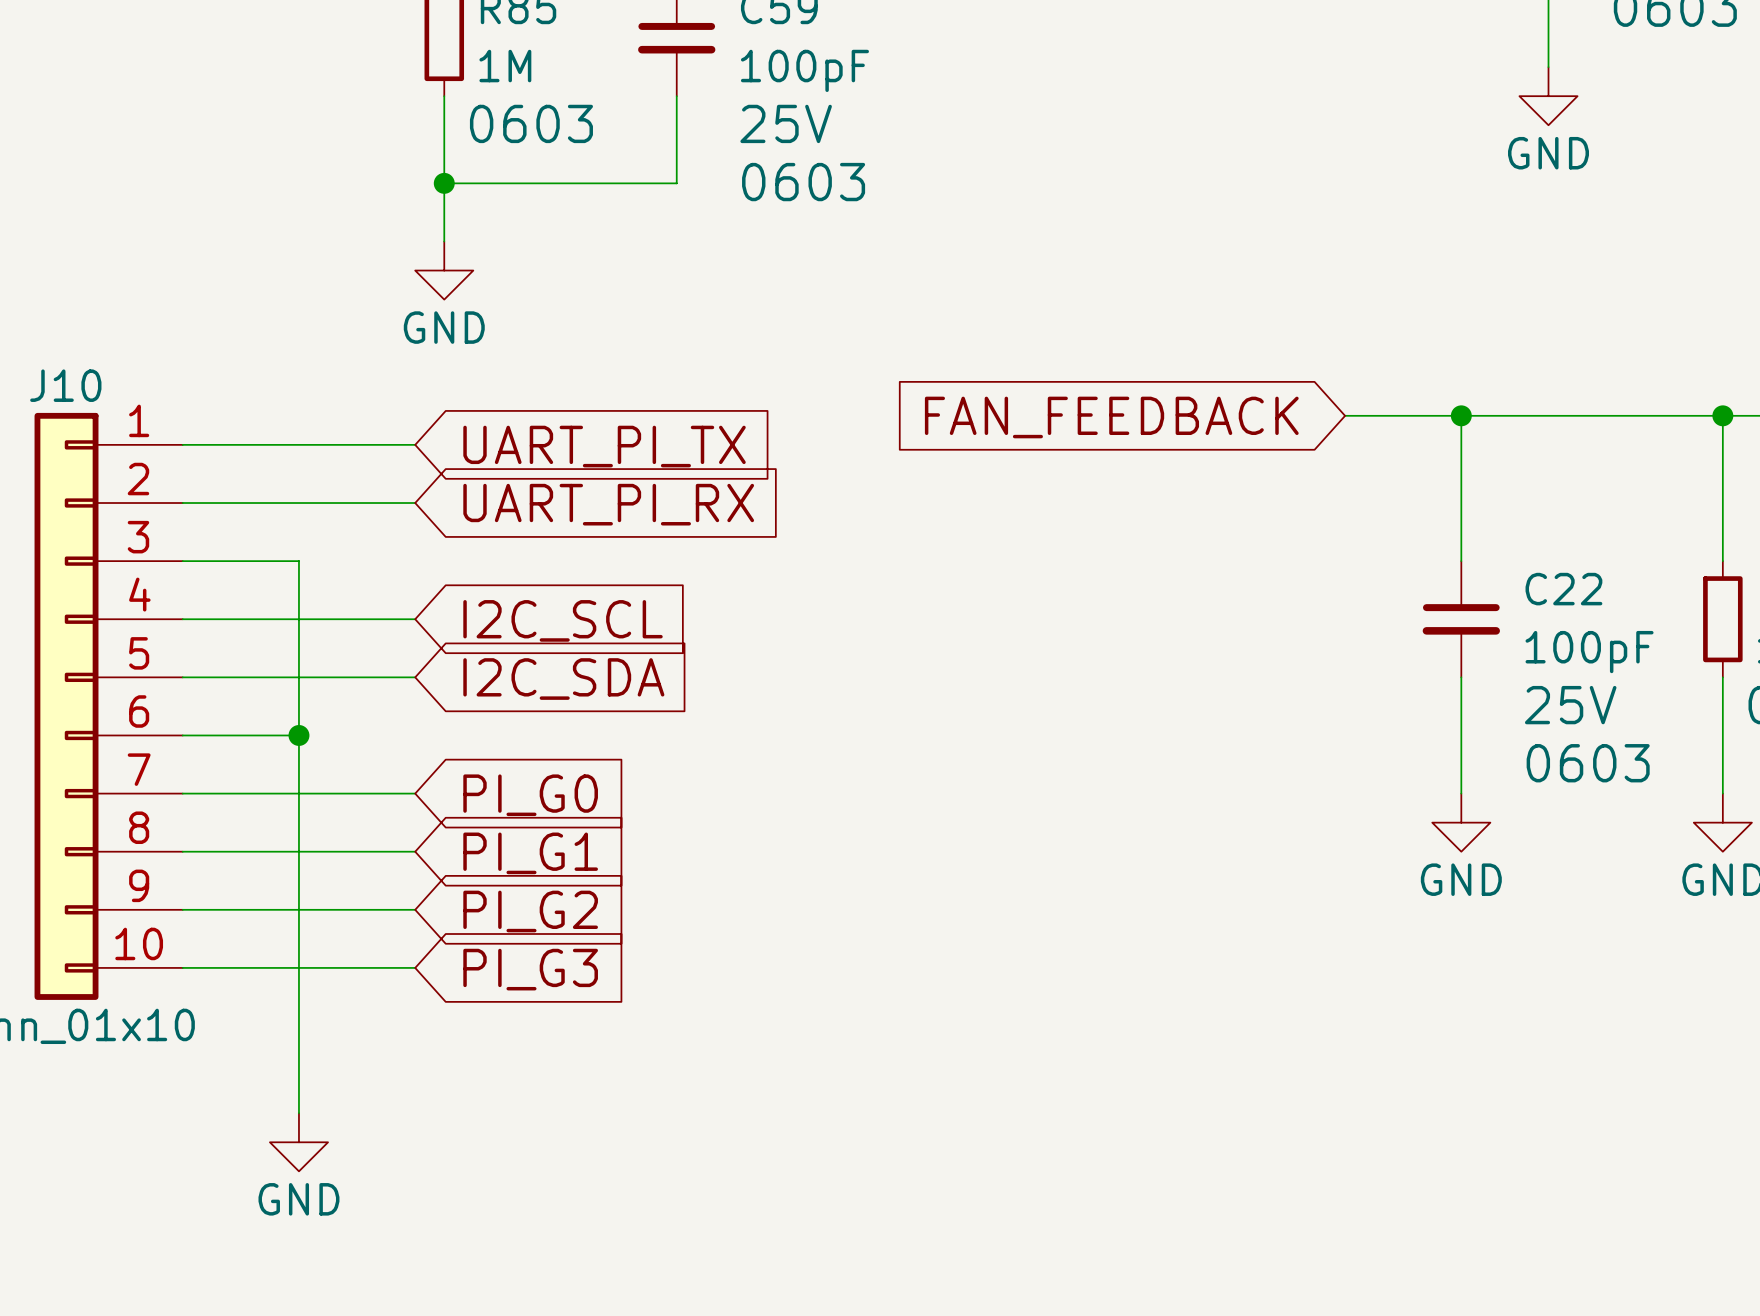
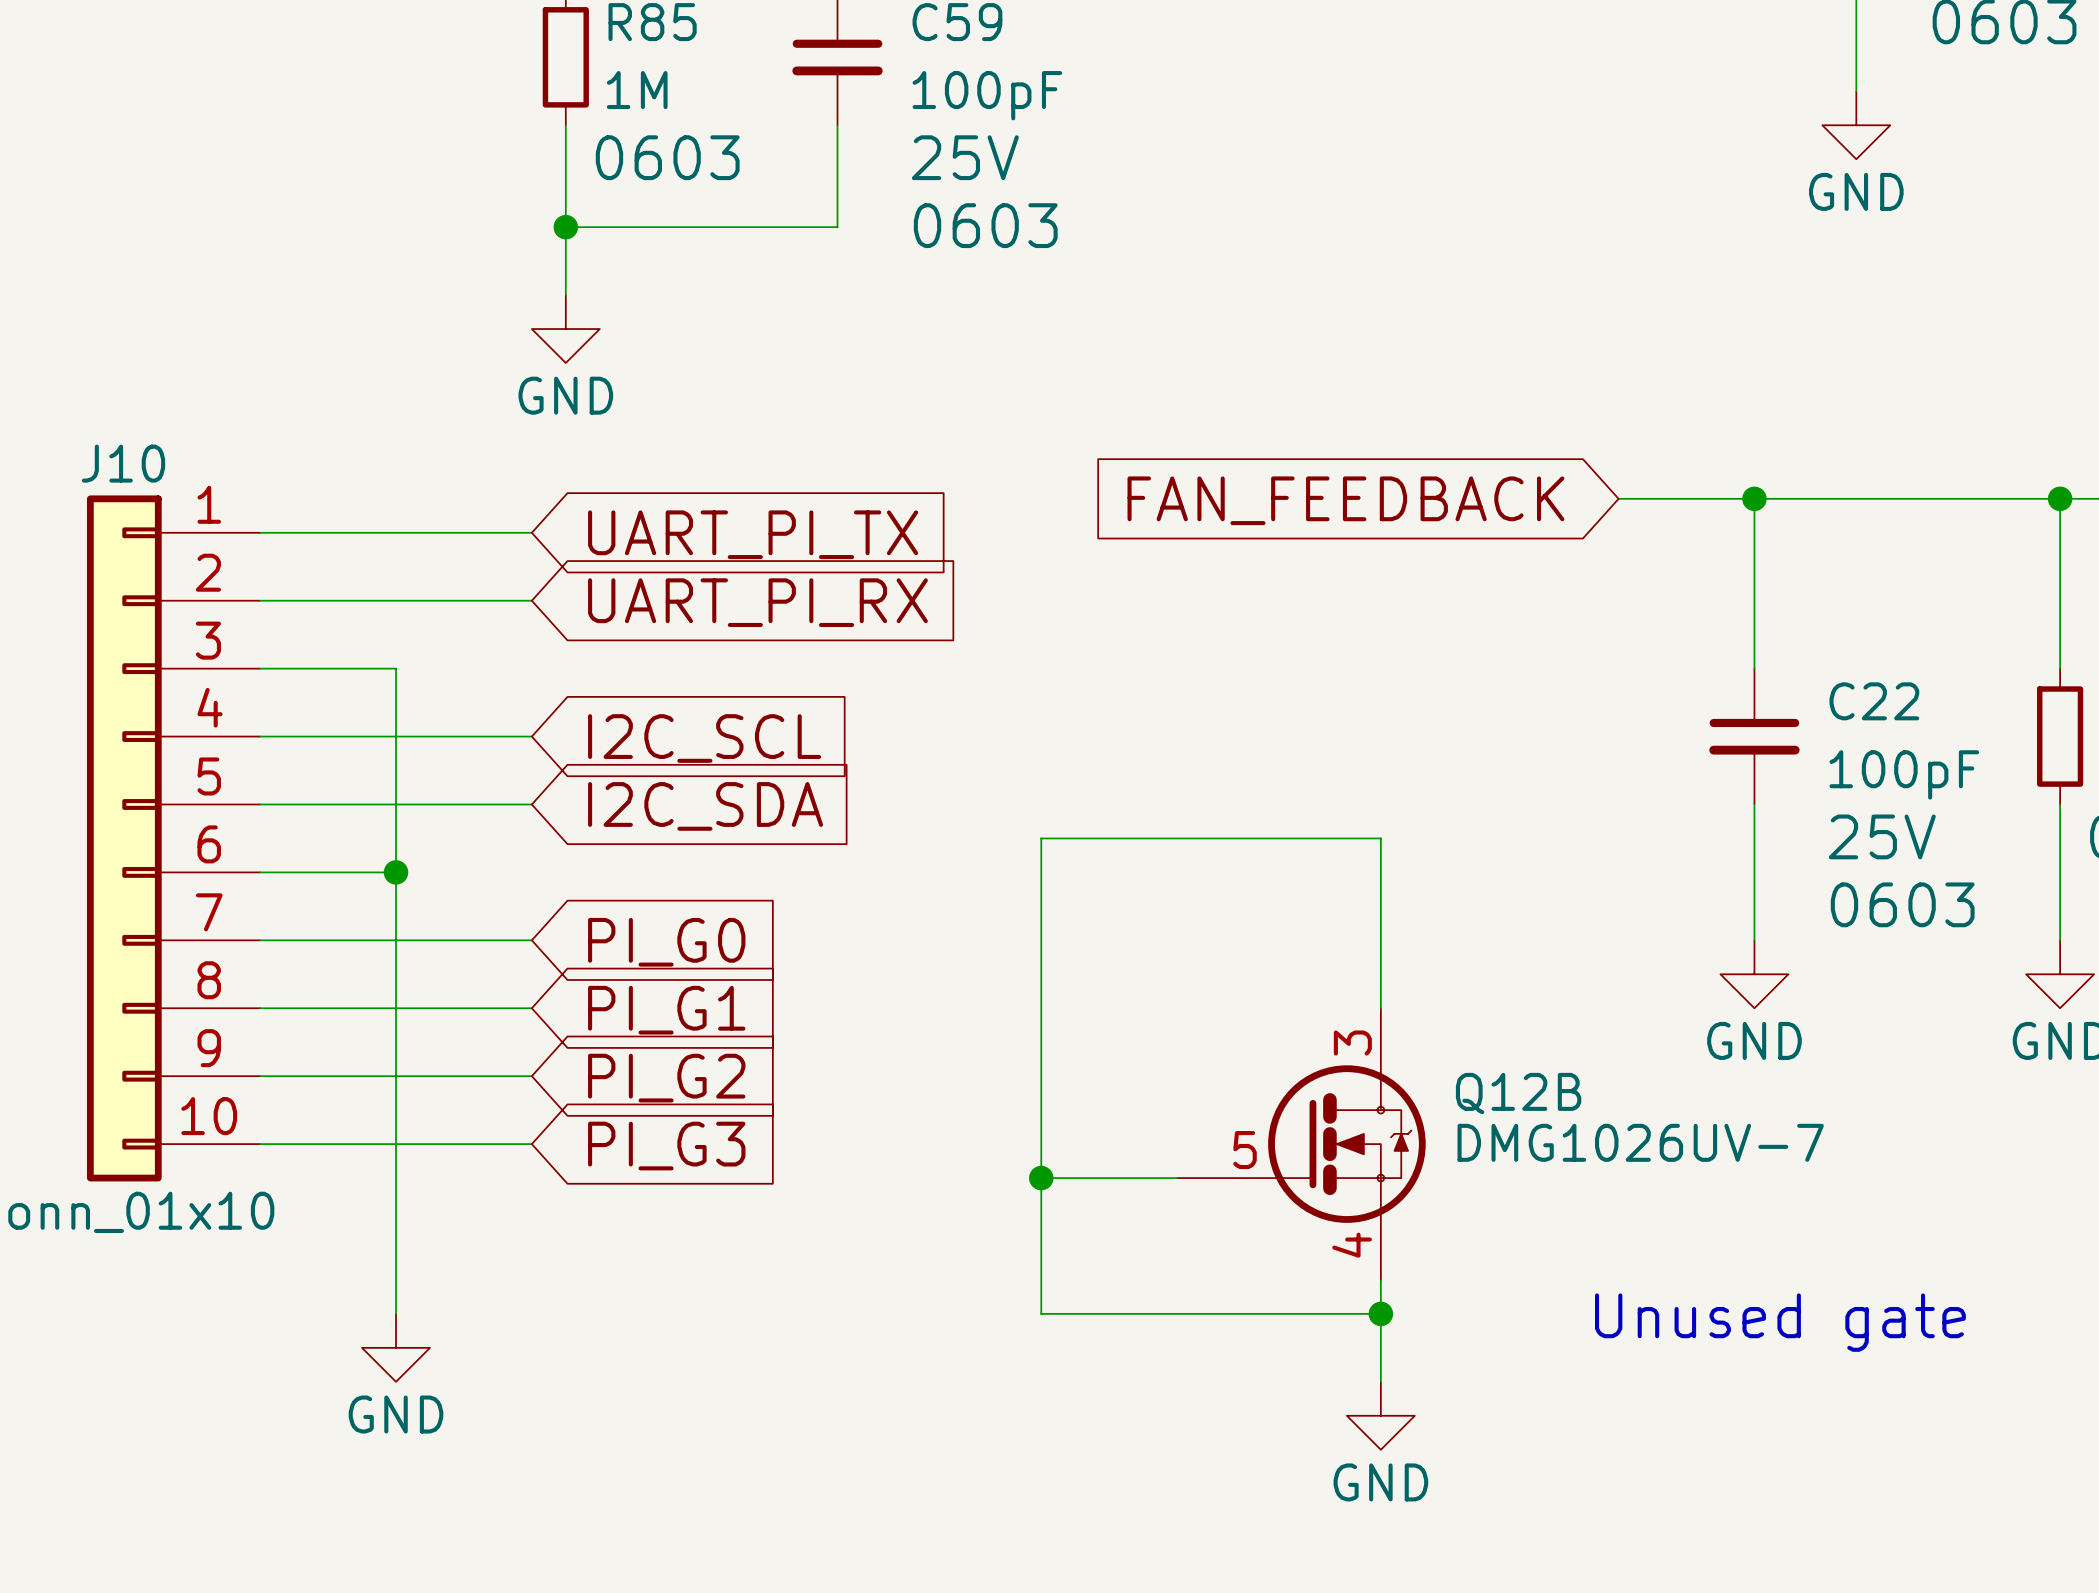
wire: none -> (1380, 1008) (1380, 838) (1041, 838) (1041, 1313) (1380, 1313)
Q12B: none -> DMG1026UV-7 (1301, 1144)
wire: none -> (1041, 1178) (1177, 1178)
junction: none -> (1041, 1178)
wire: none -> (1380, 1279) (1380, 1381)
junction: none -> (1380, 1313)
text: none -> Unused gate (1780, 1322)
power symbol: none -> GND (1380, 1415)

